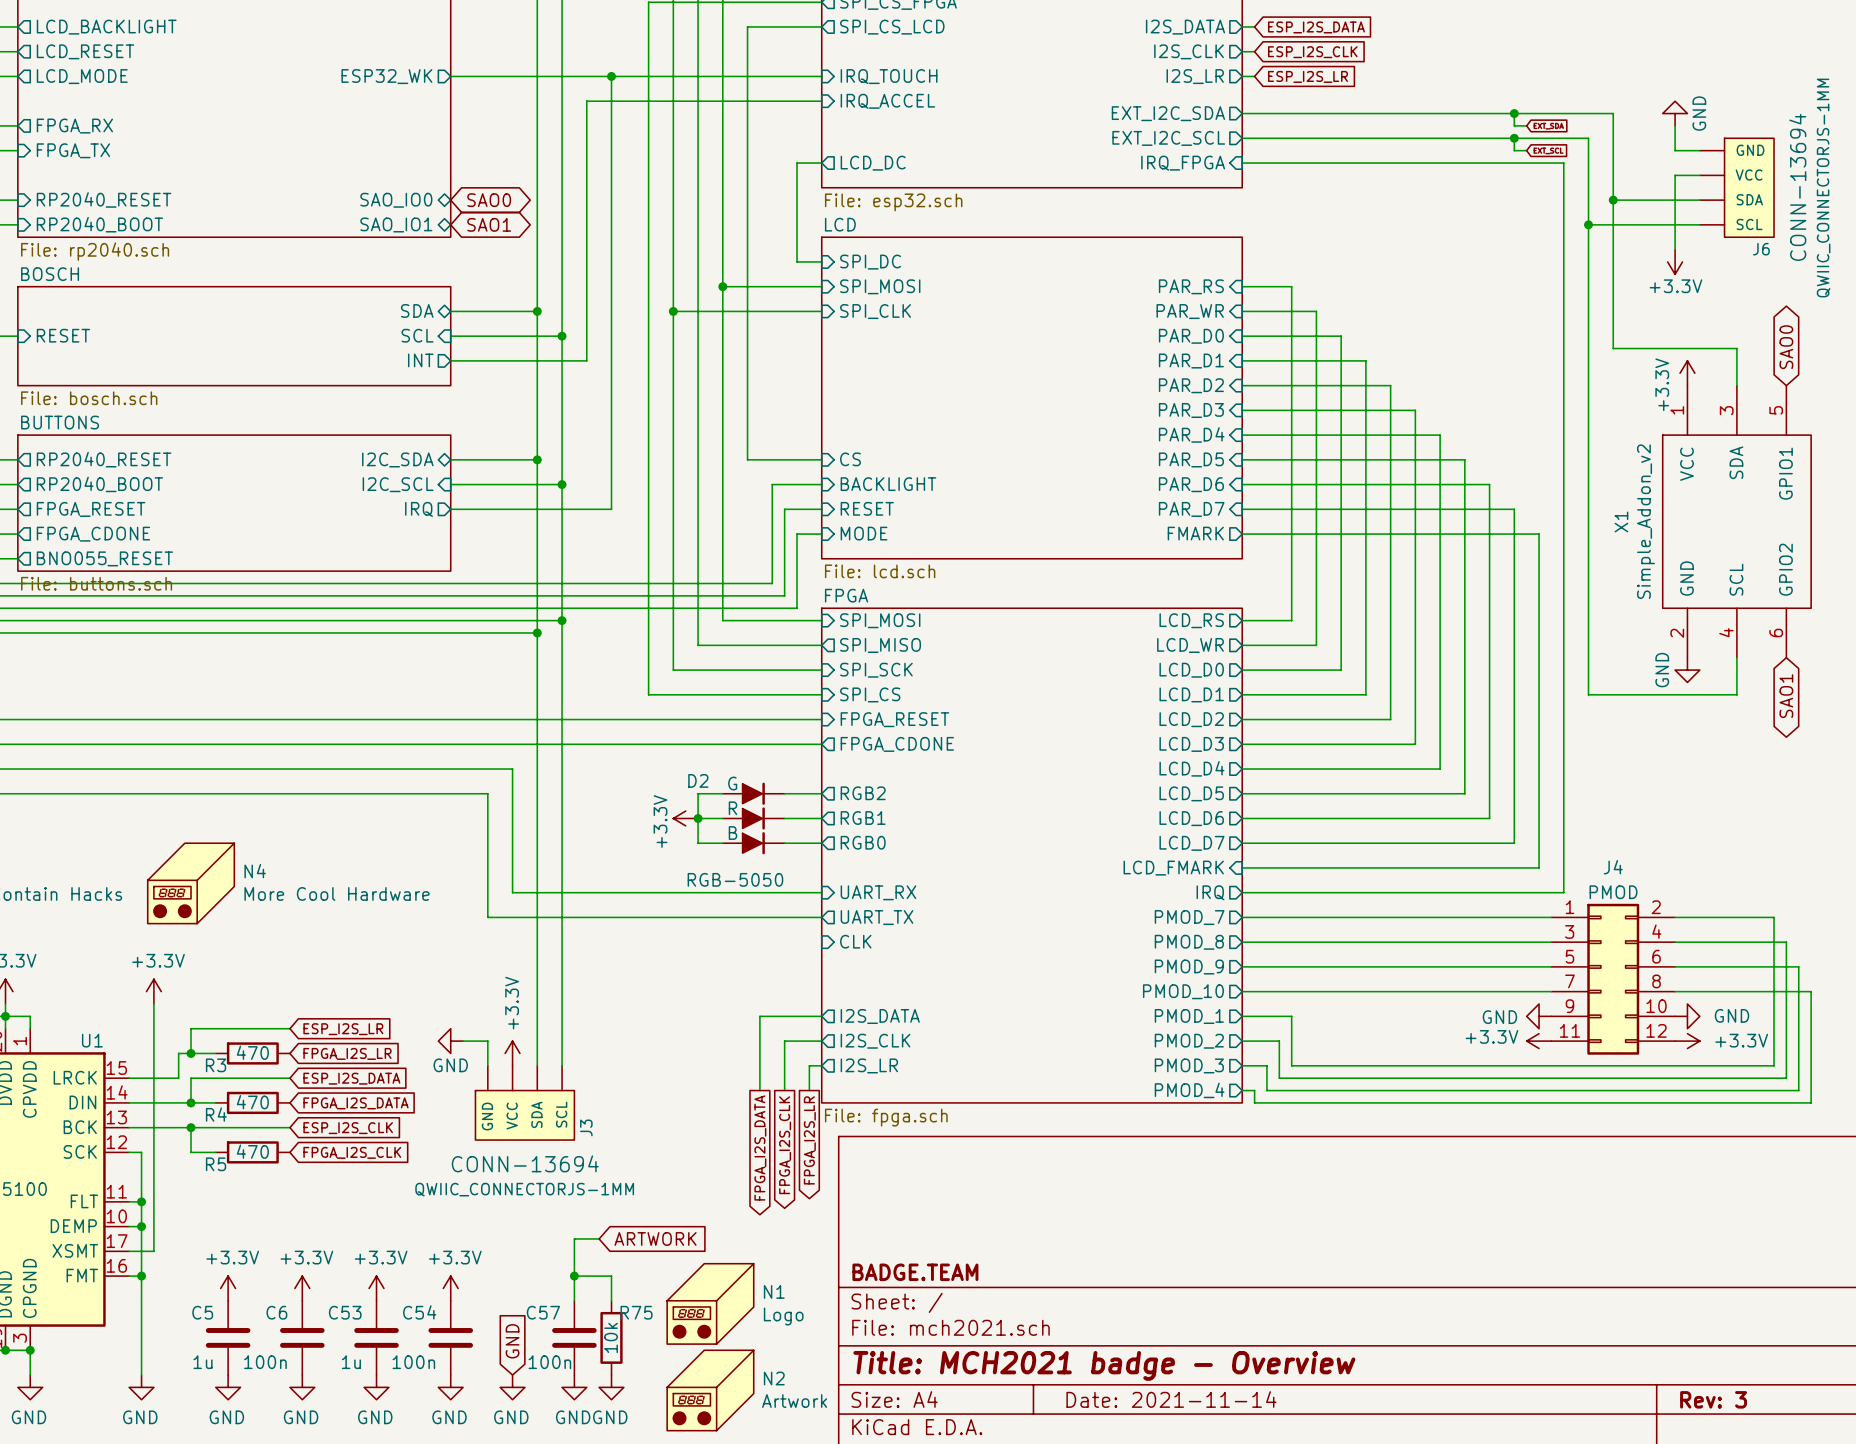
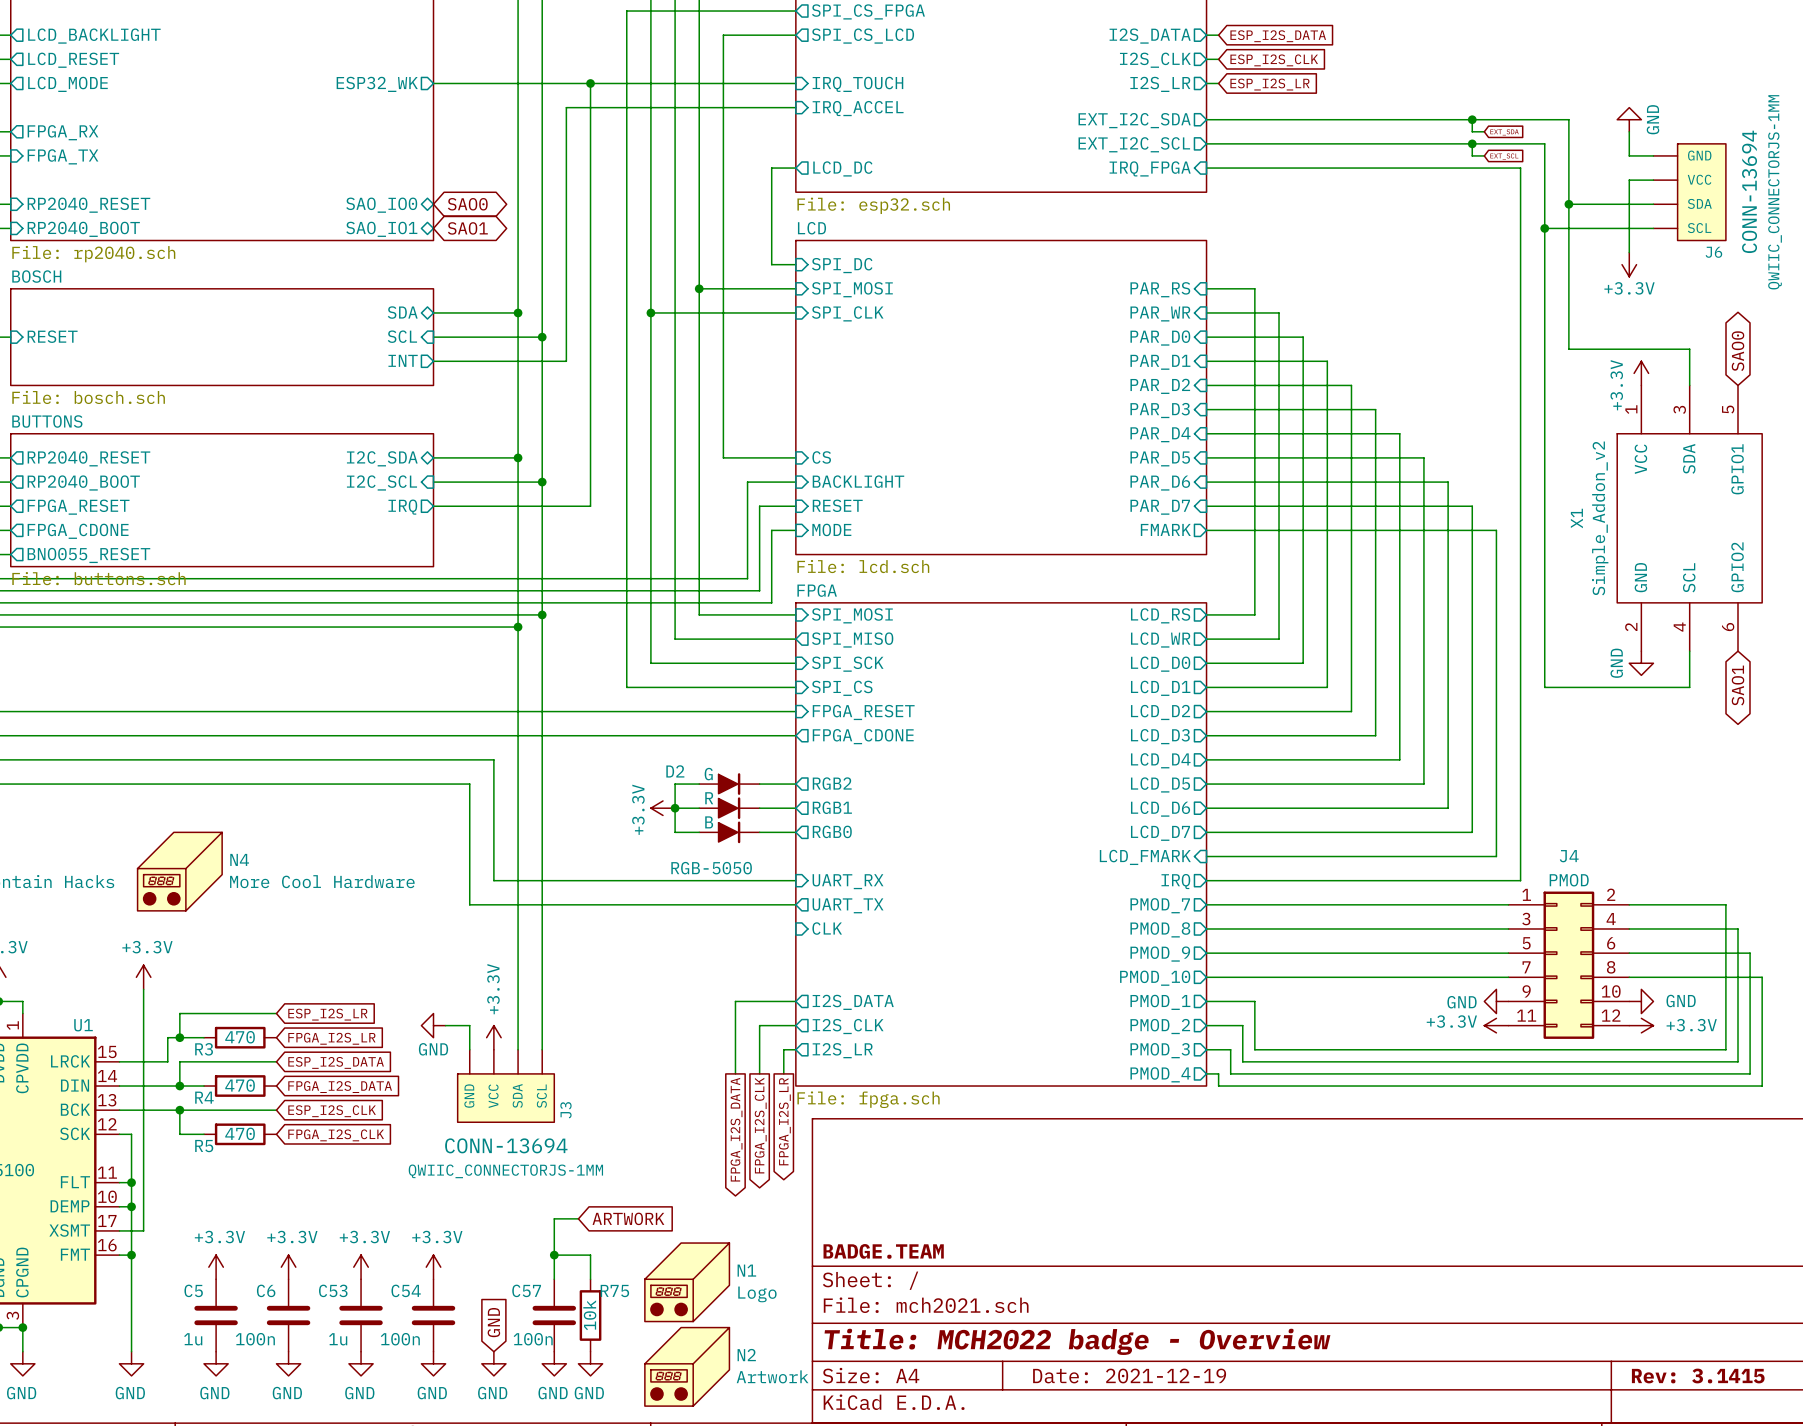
title block: Title: MCH2021 badge - Overview (1104, 1365) -> Title: MCH2022 badge - Overview (1077, 1341)
title block: Date: 2021-11-14 (1171, 1399) -> Date: 2021-12-19 (1129, 1376)
title block: Rev: 3 (1713, 1399) -> Rev: 3.1415 (1698, 1376)

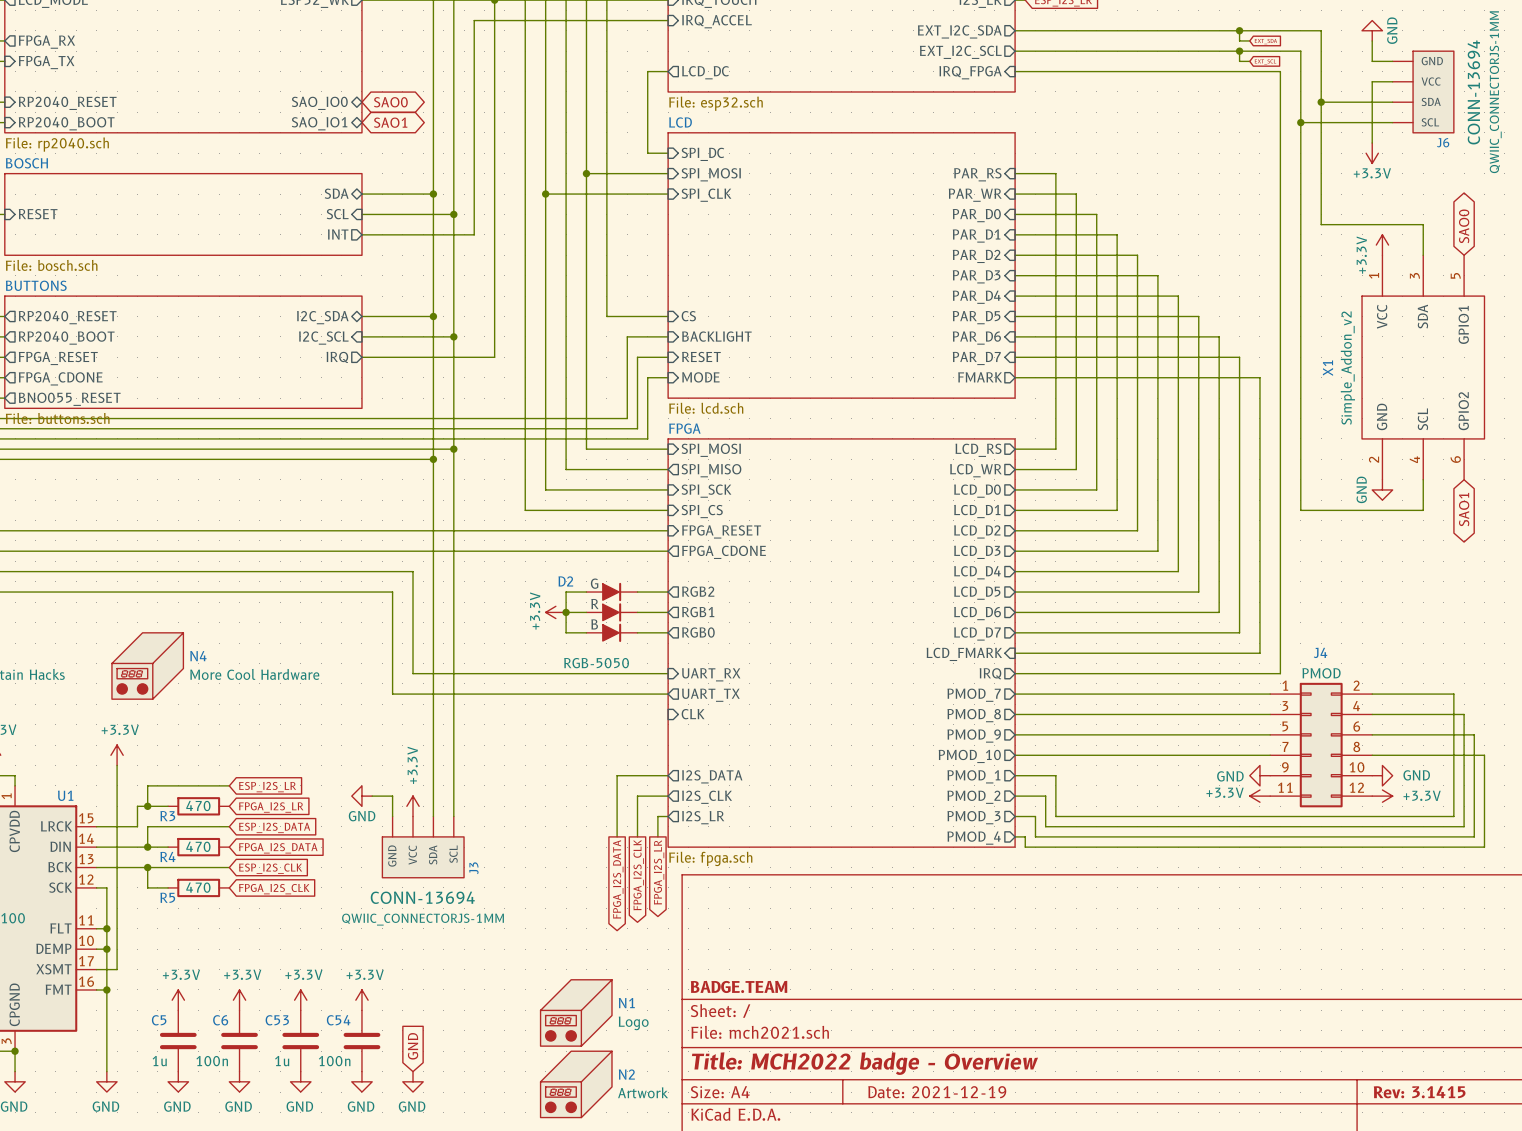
wire: (578, 1218) (554, 1218) (554, 1279) -> none
global label: ARTWORK (628, 1218) -> none
wire: (554, 1255) (590, 1255) (590, 1279) -> none
junction: (554, 1255) -> none
C57: 100n (554, 1315) -> none
R75: 10k (590, 1315) -> none
power symbol: GND (554, 1363) -> none
power symbol: GND (590, 1363) -> none

